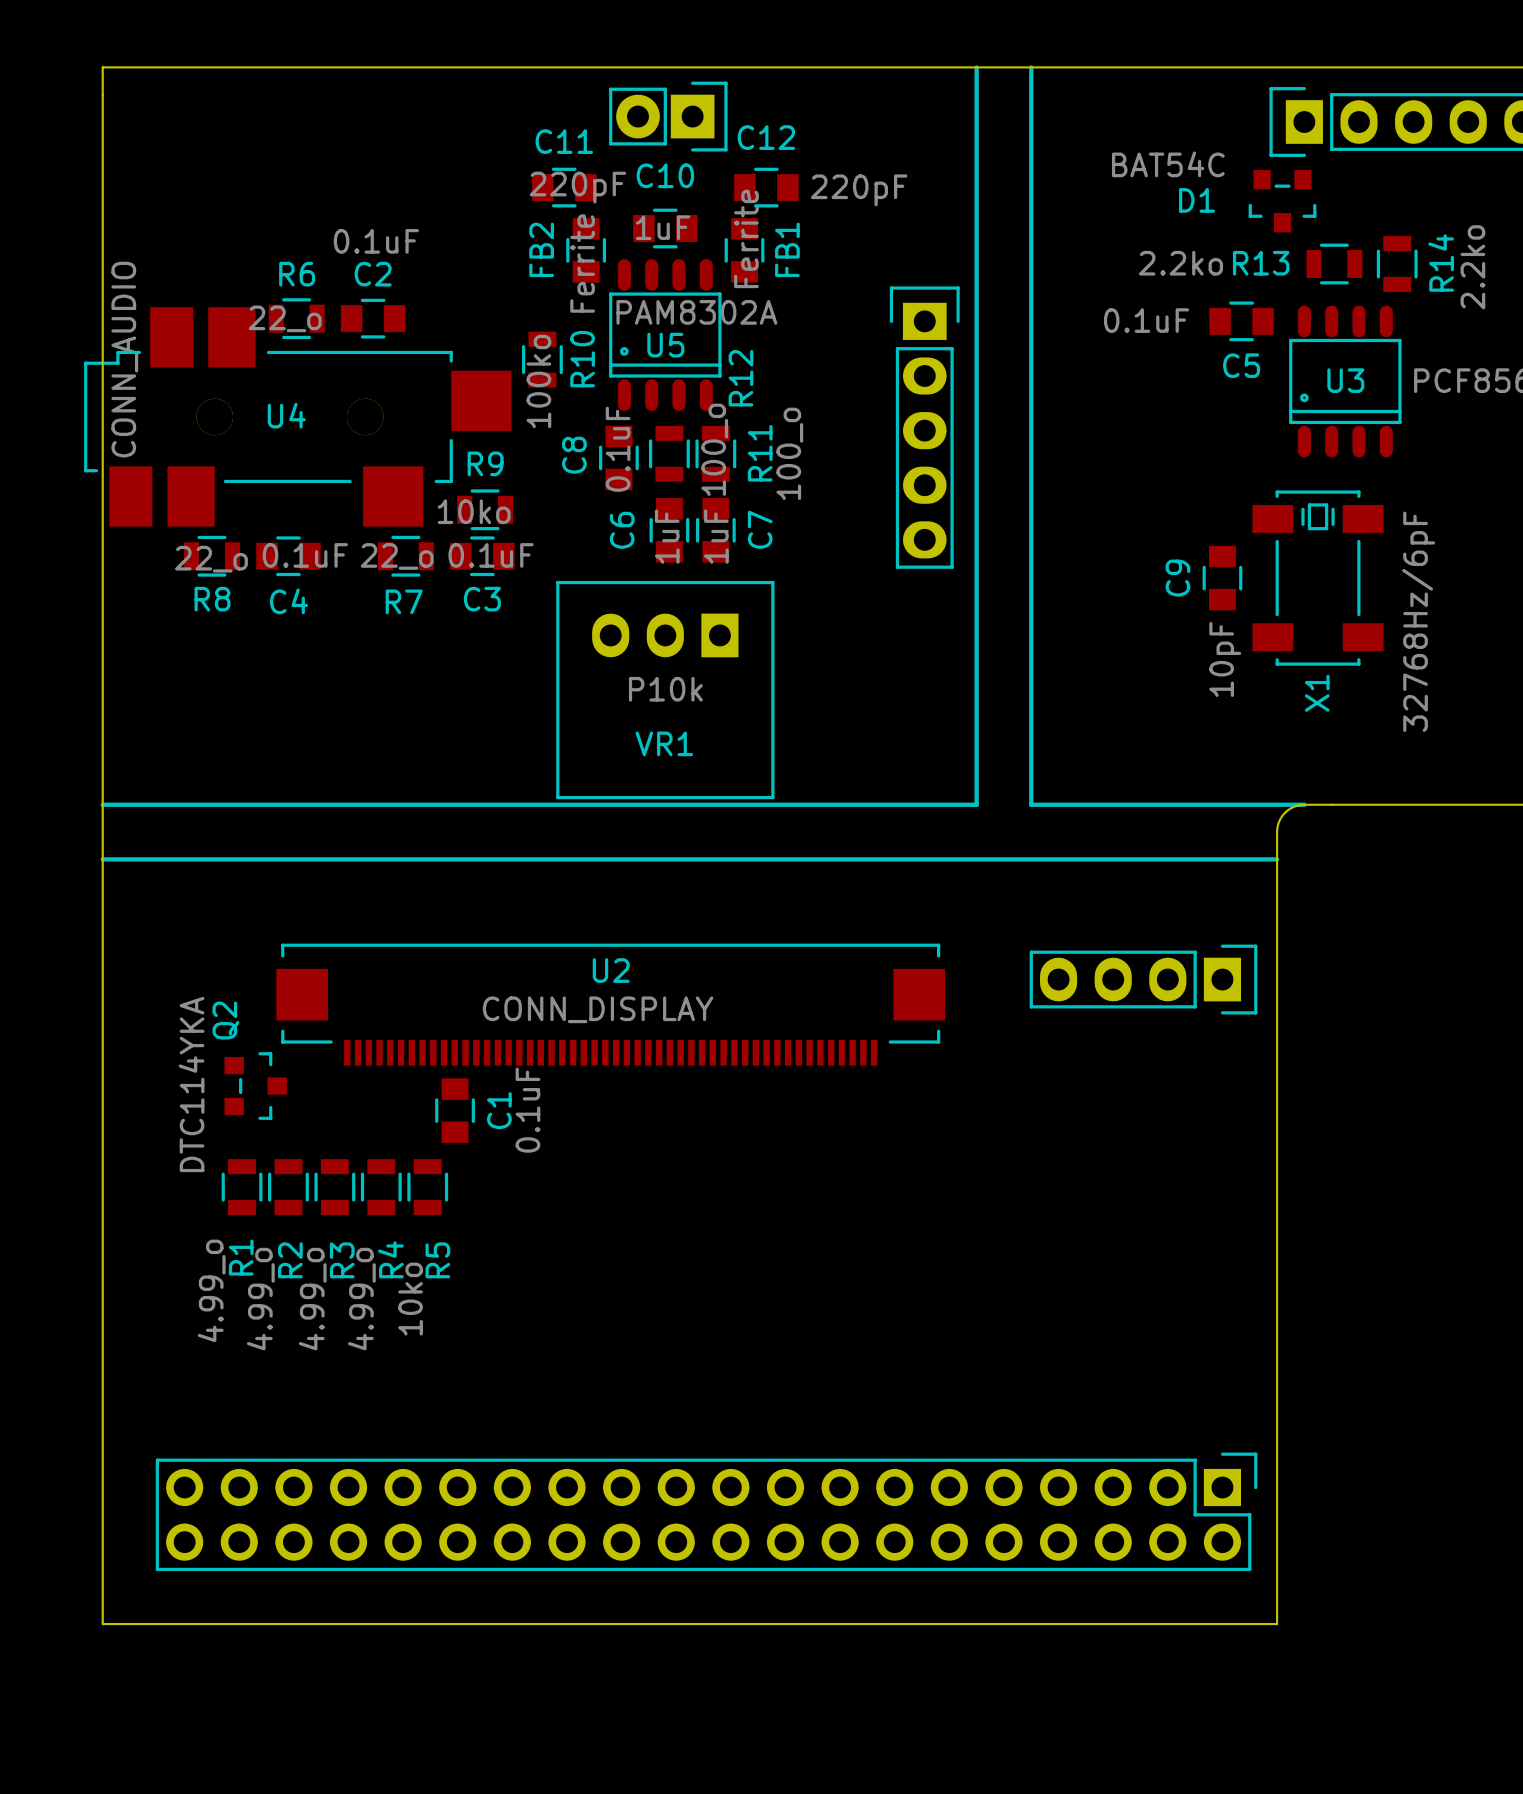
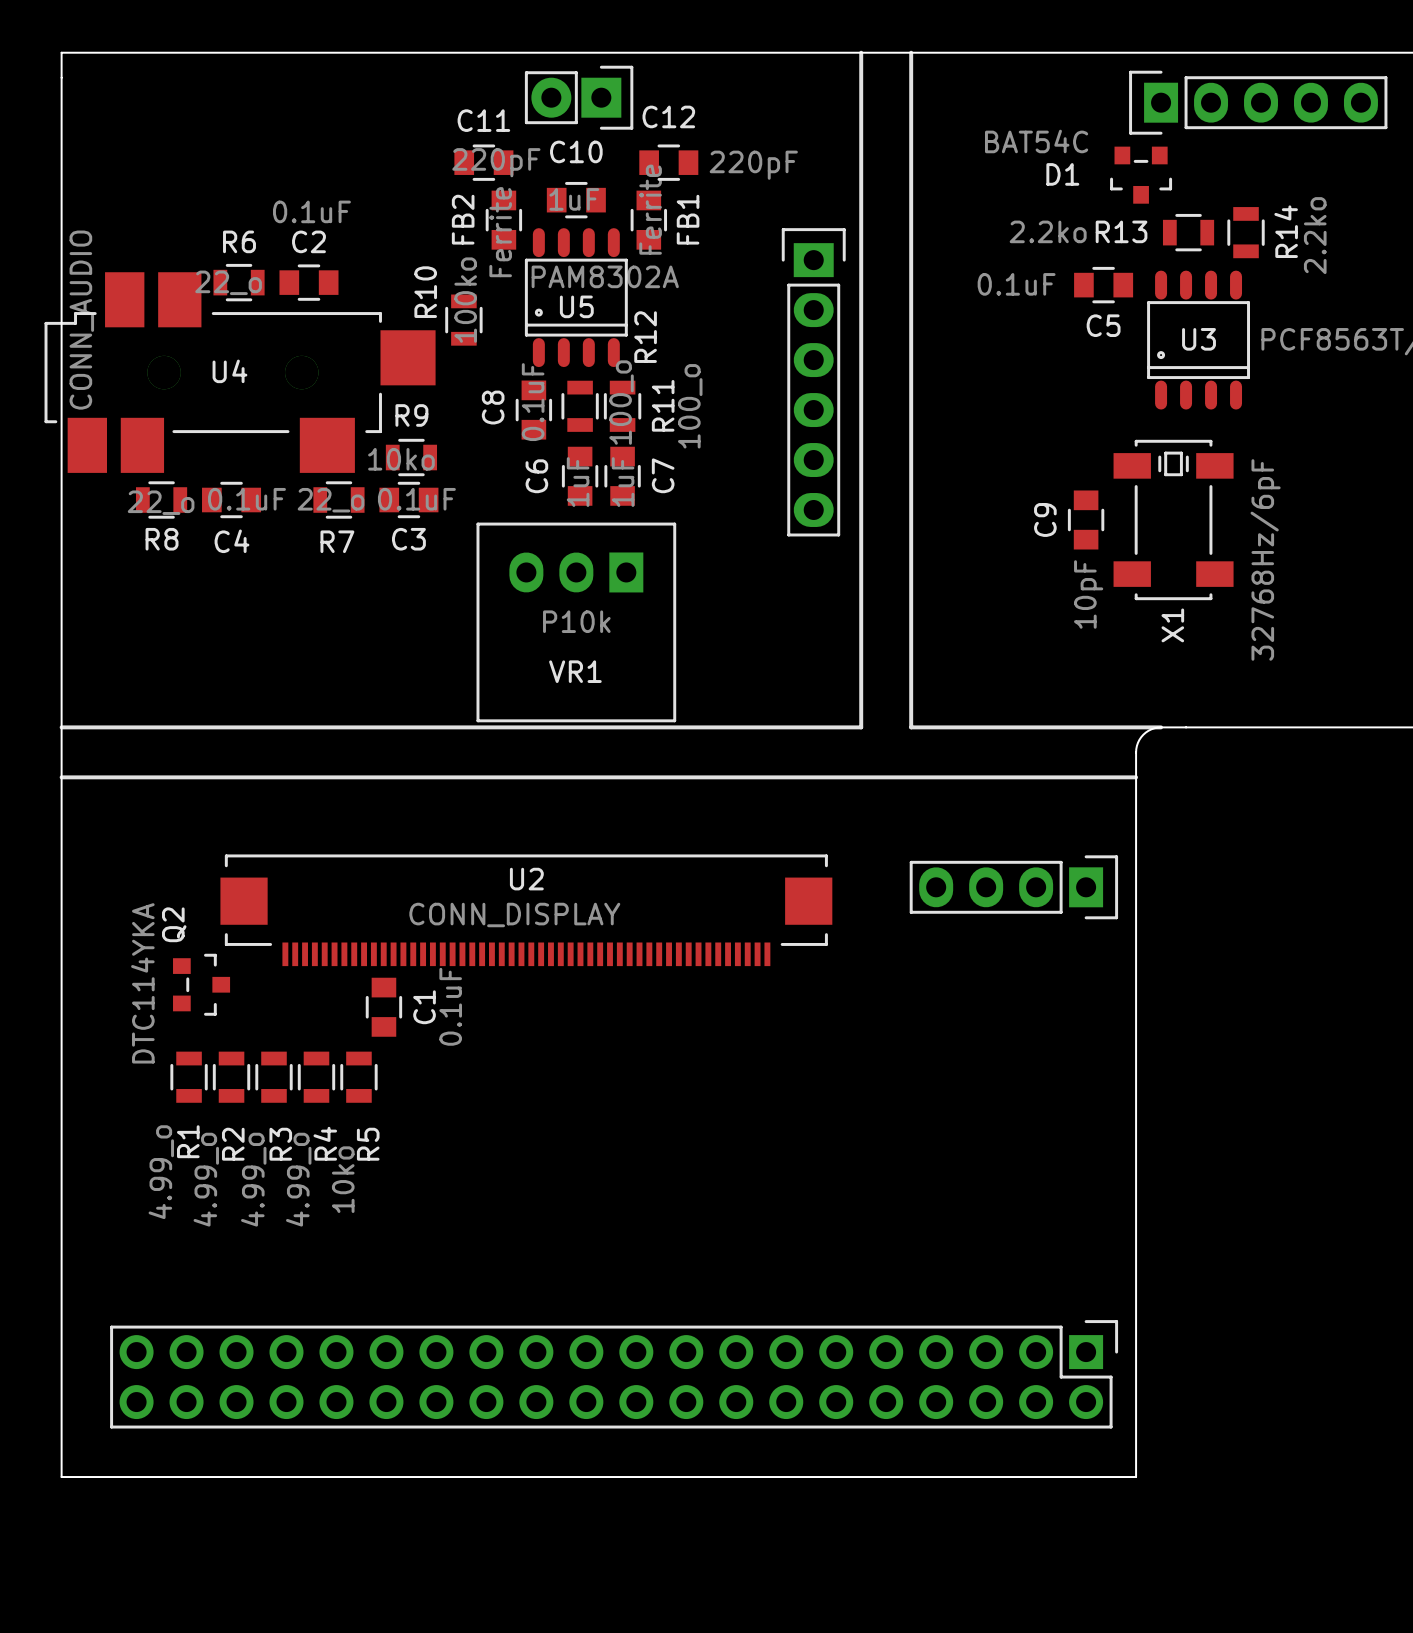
part footprint: [889, 286, 960, 569] -> [781, 228, 846, 537]
R10 name position: R10 (582, 359) -> R10 (425, 292)
R10 value position: 100ko (538, 381) -> 100ko (465, 300)

